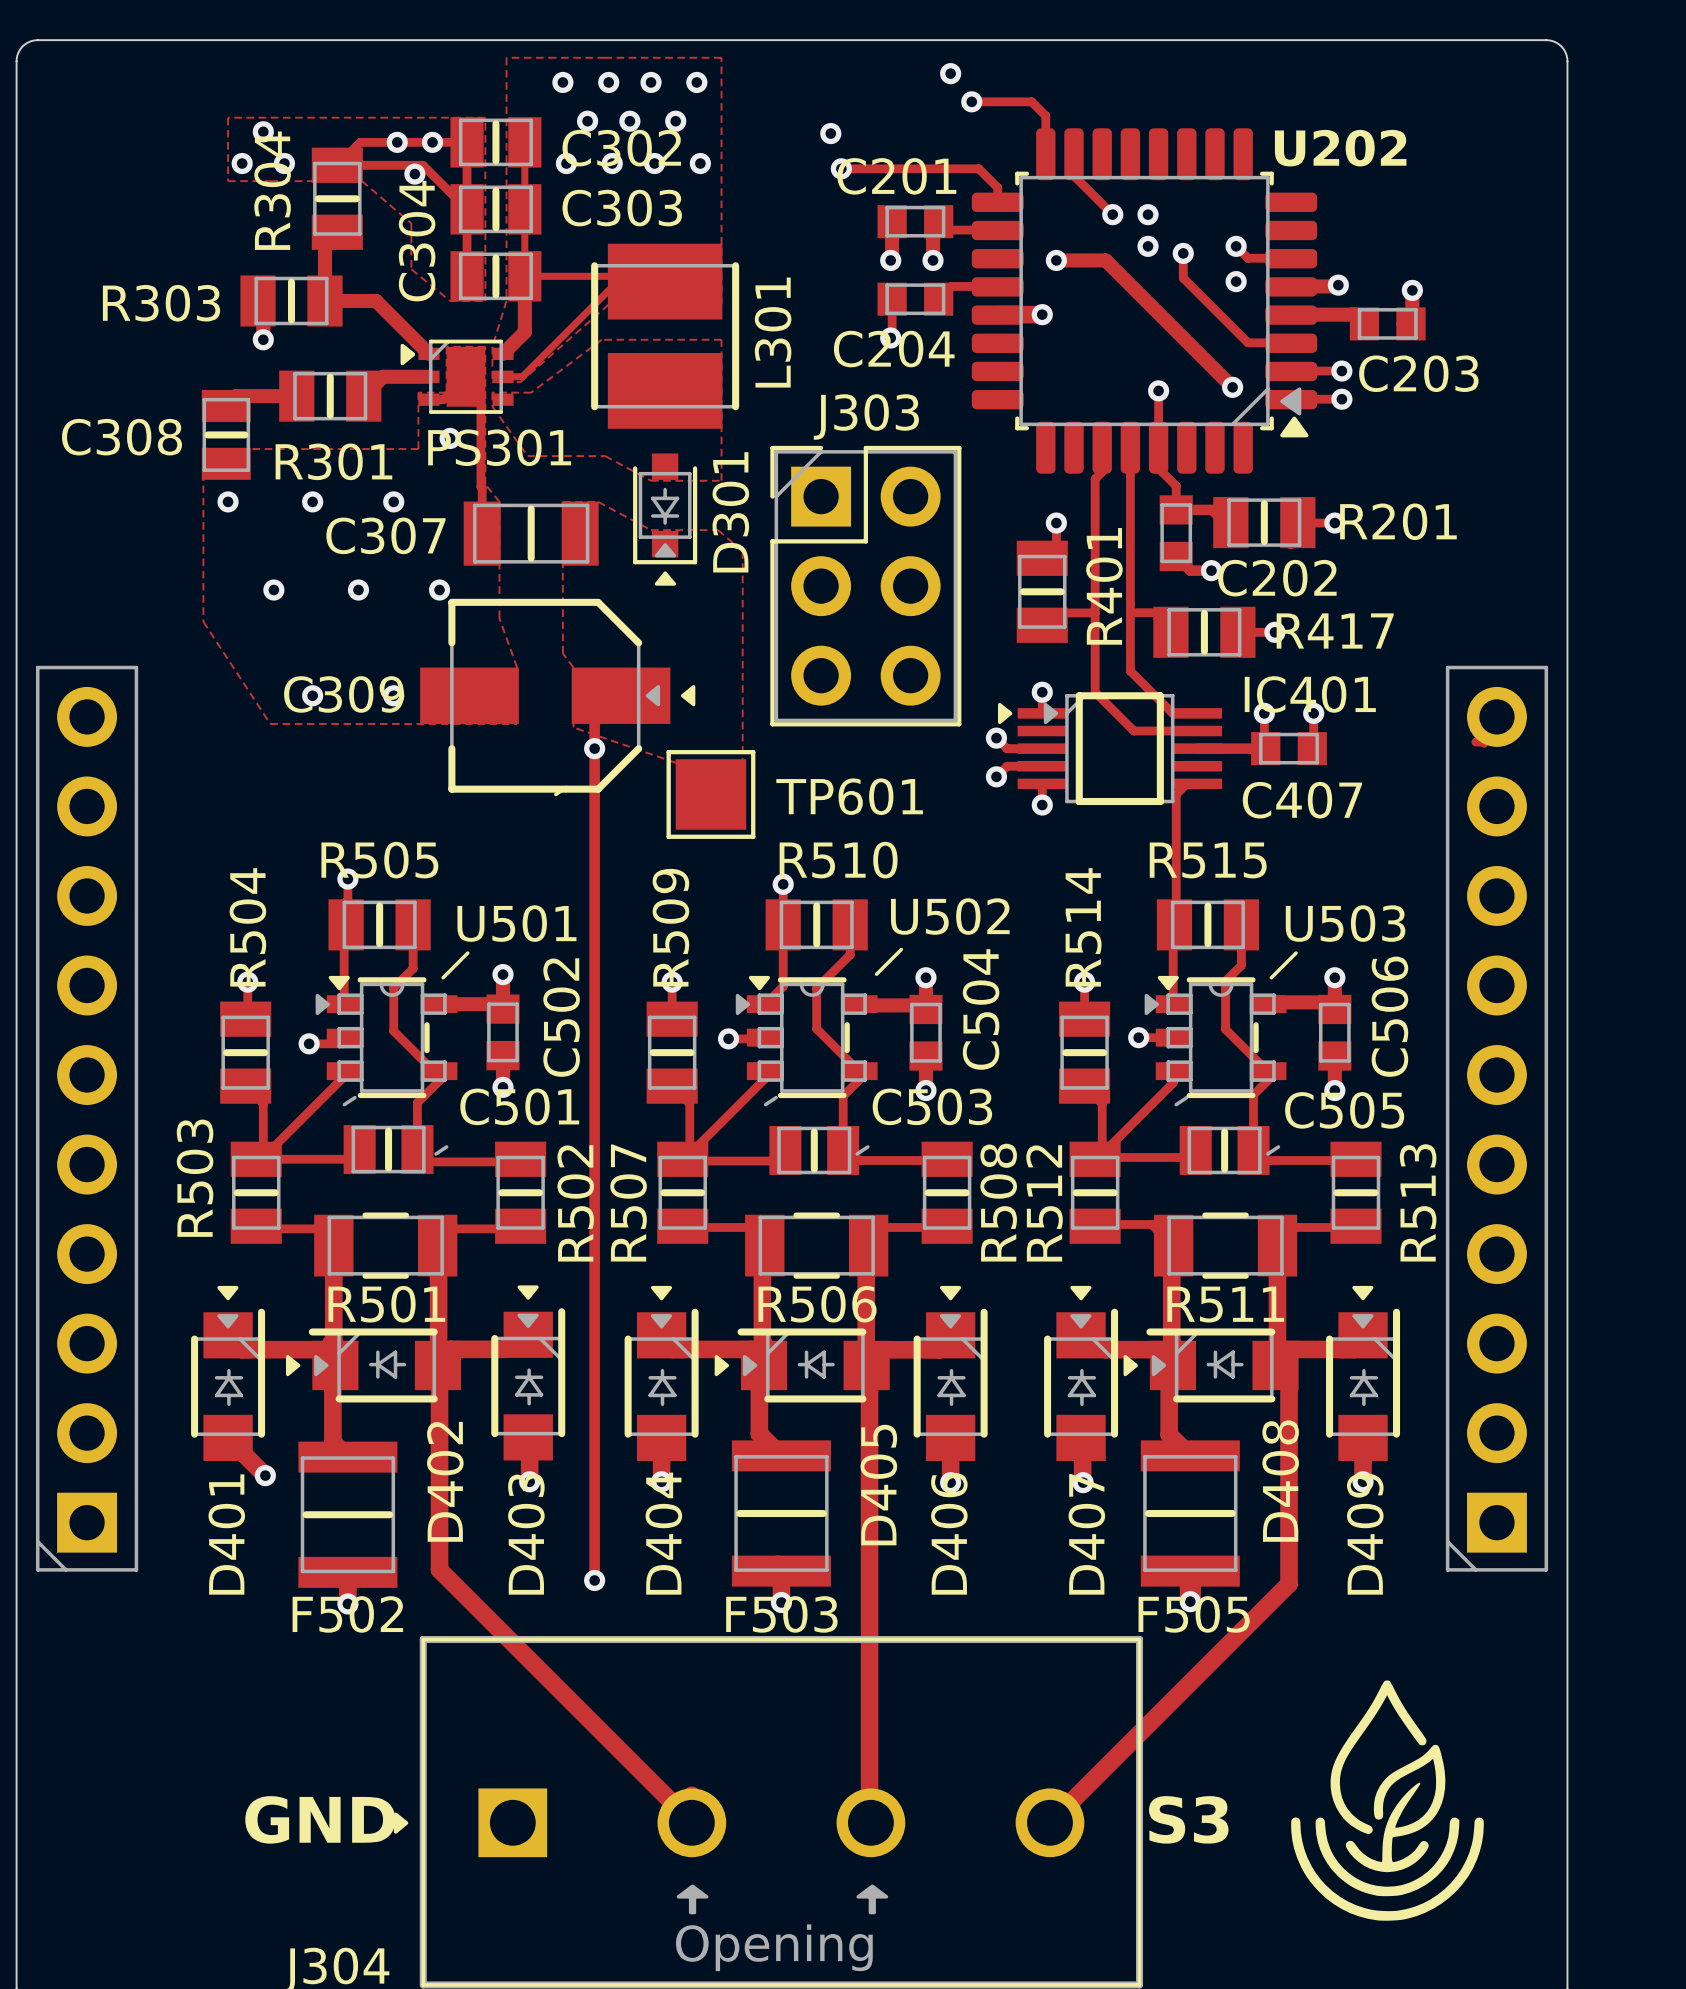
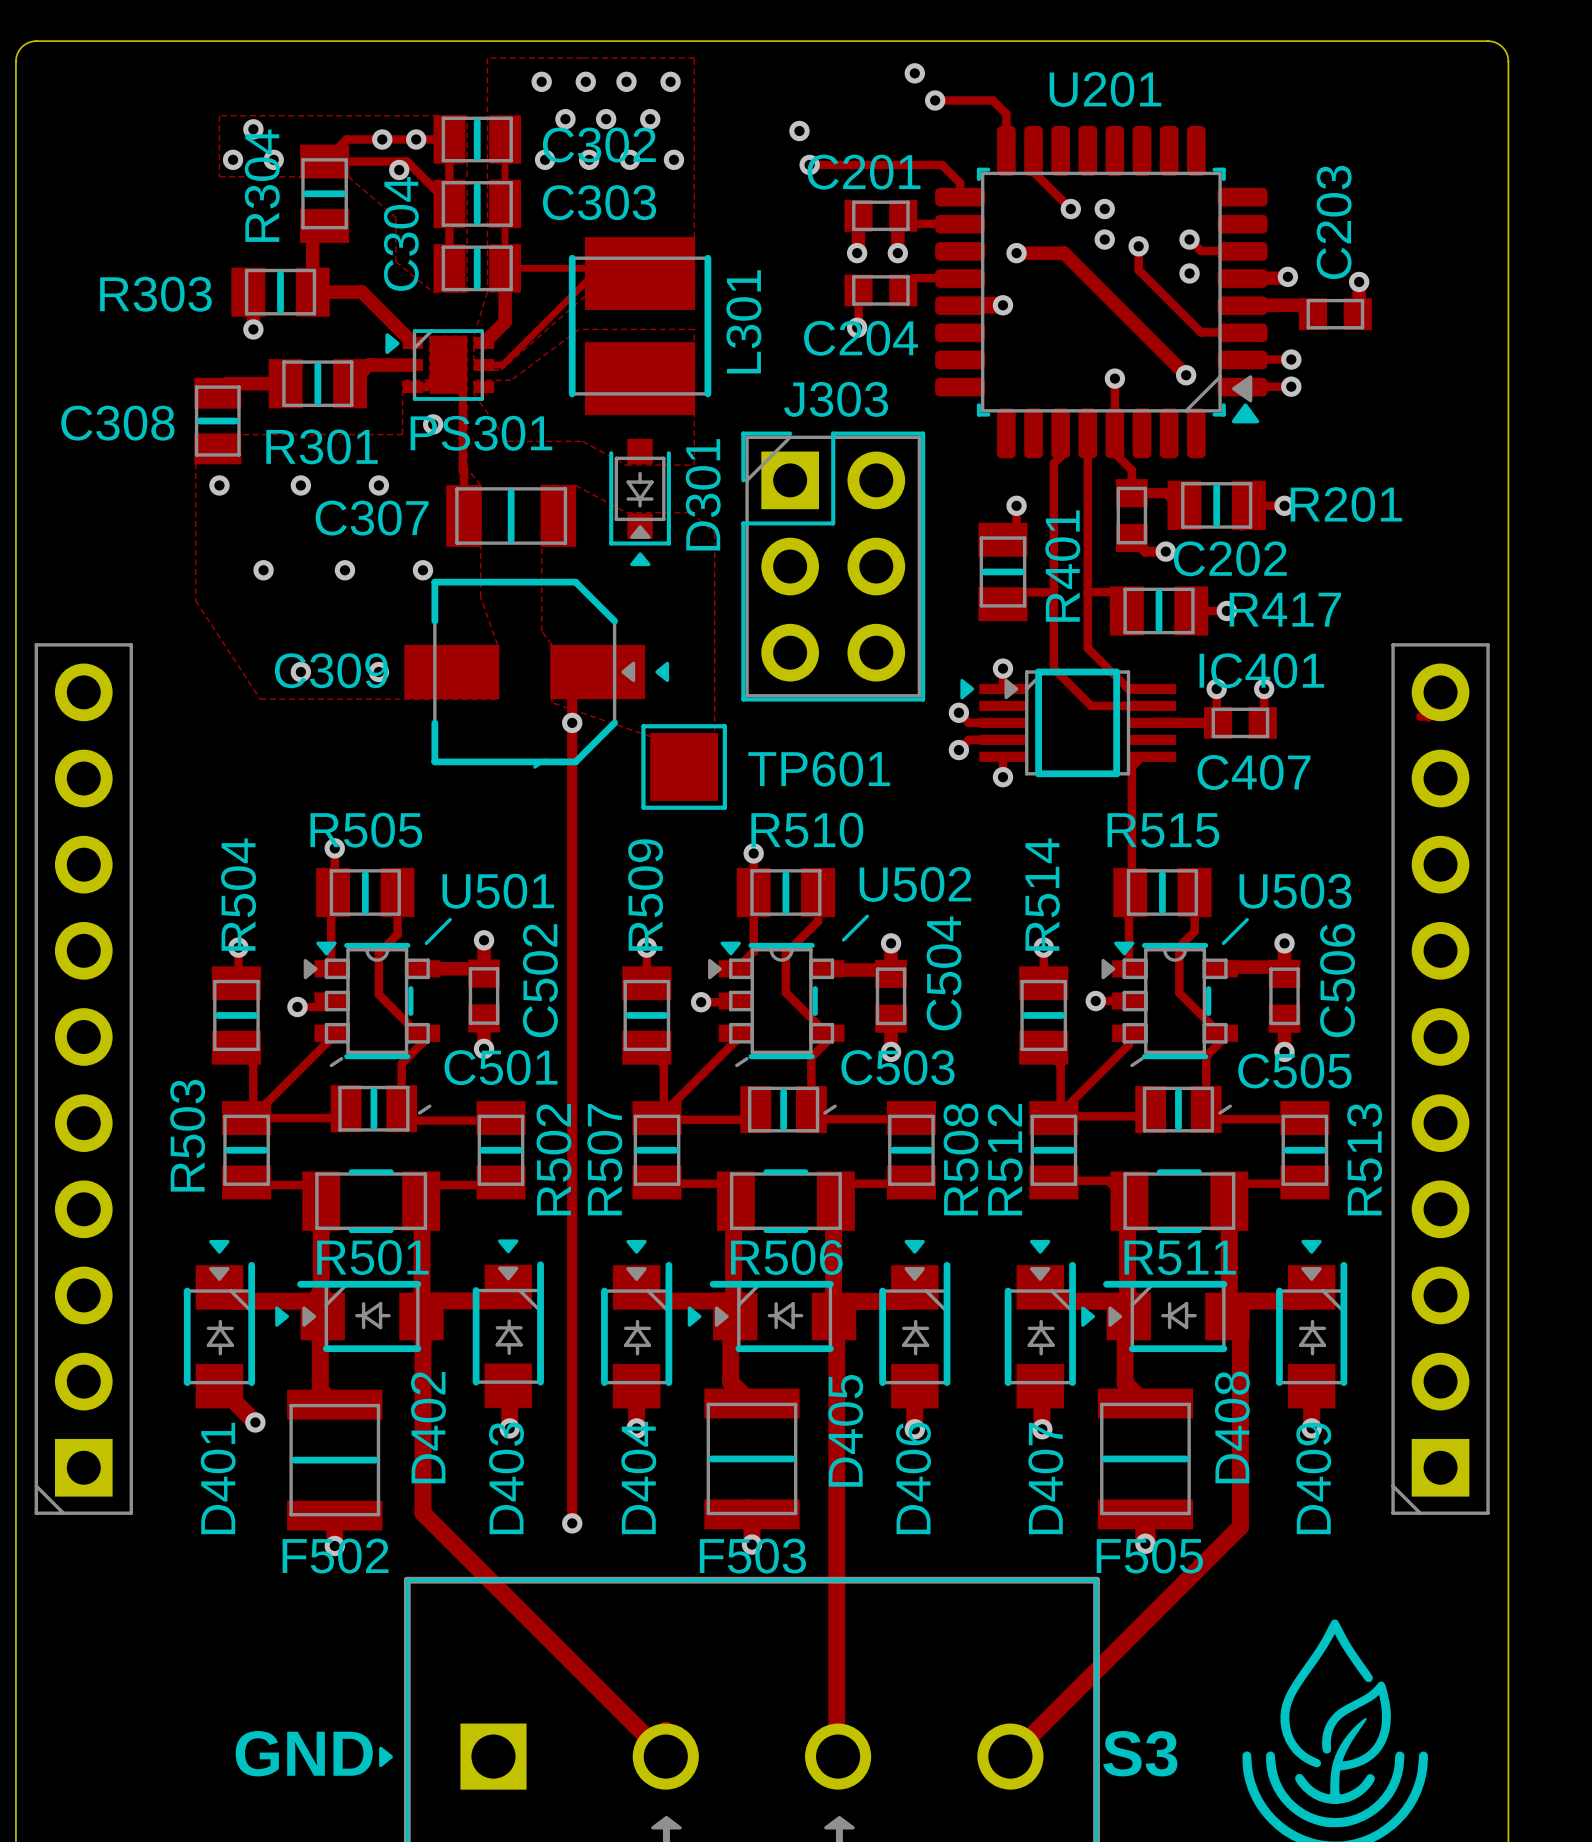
U202 name: U202 (1340, 148) -> U201 (1105, 89)
C203 name rotation: 0° (1418, 373) -> 90° counterclockwise (1334, 222)

